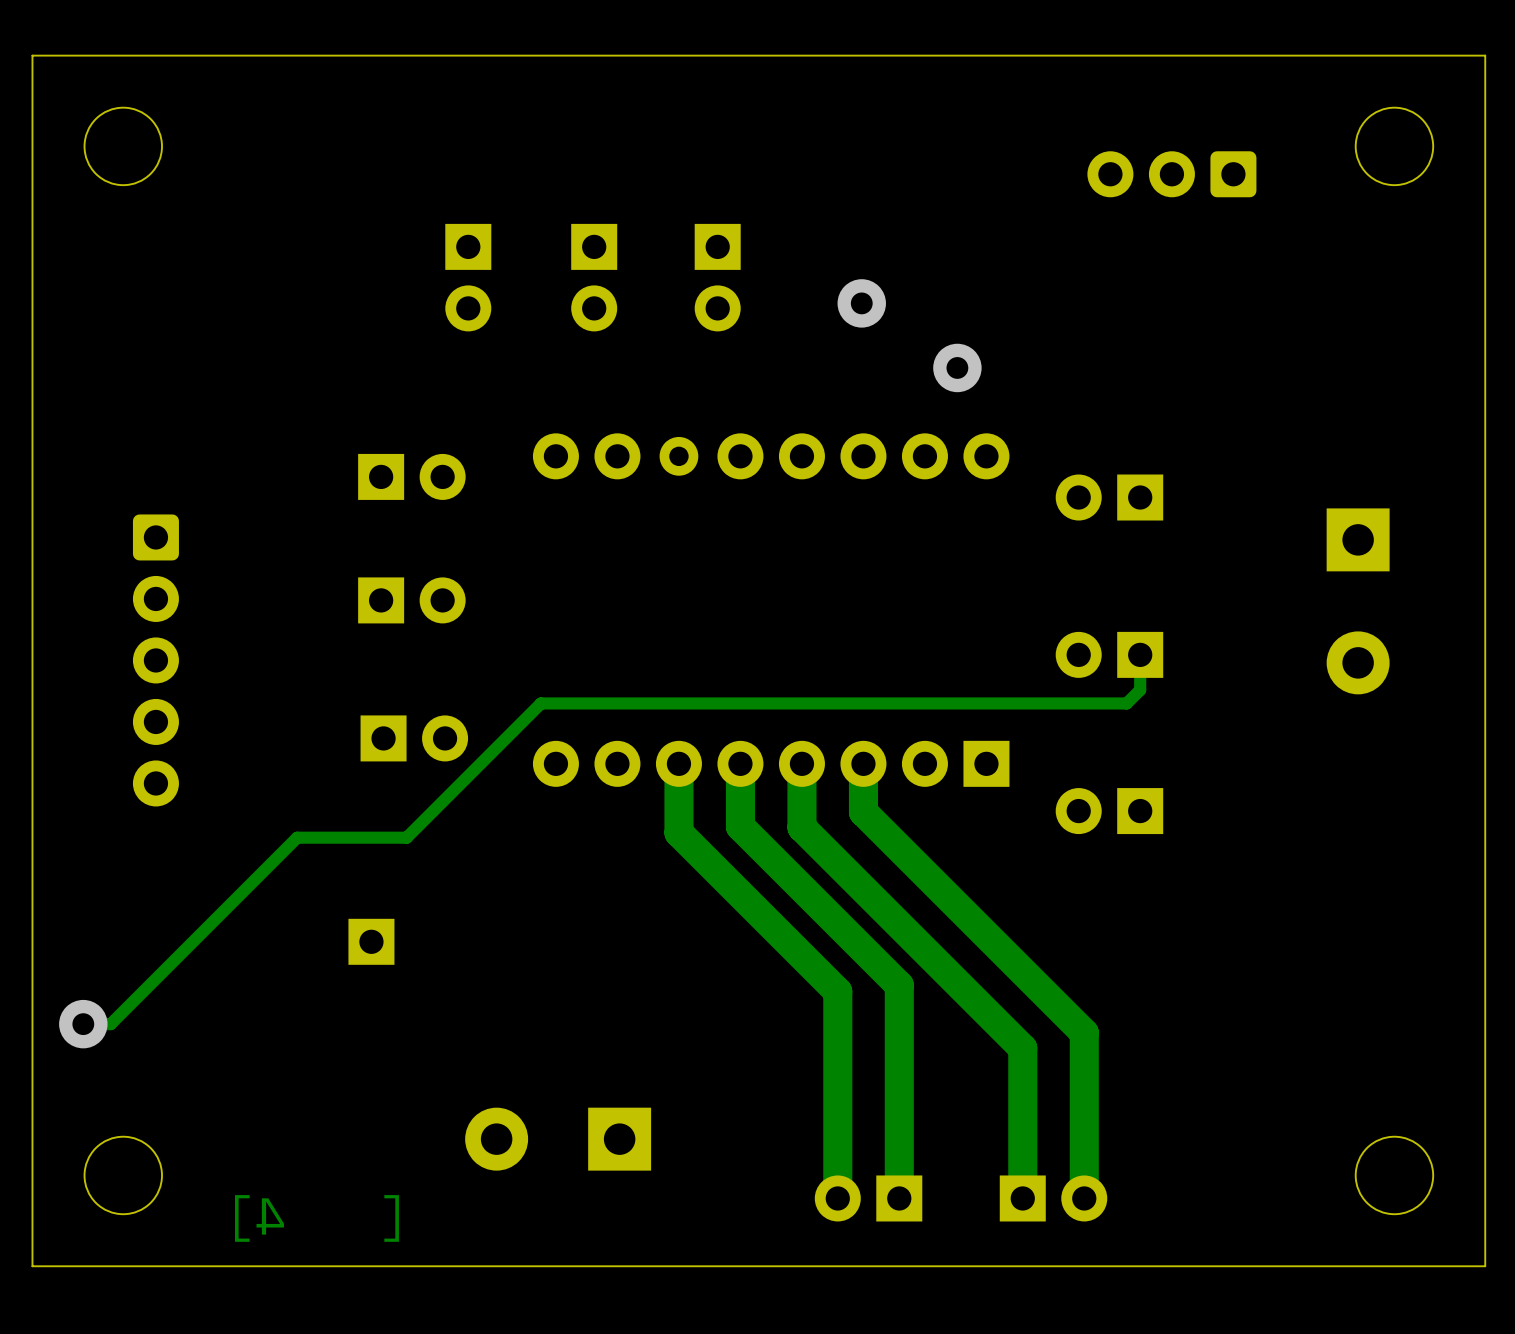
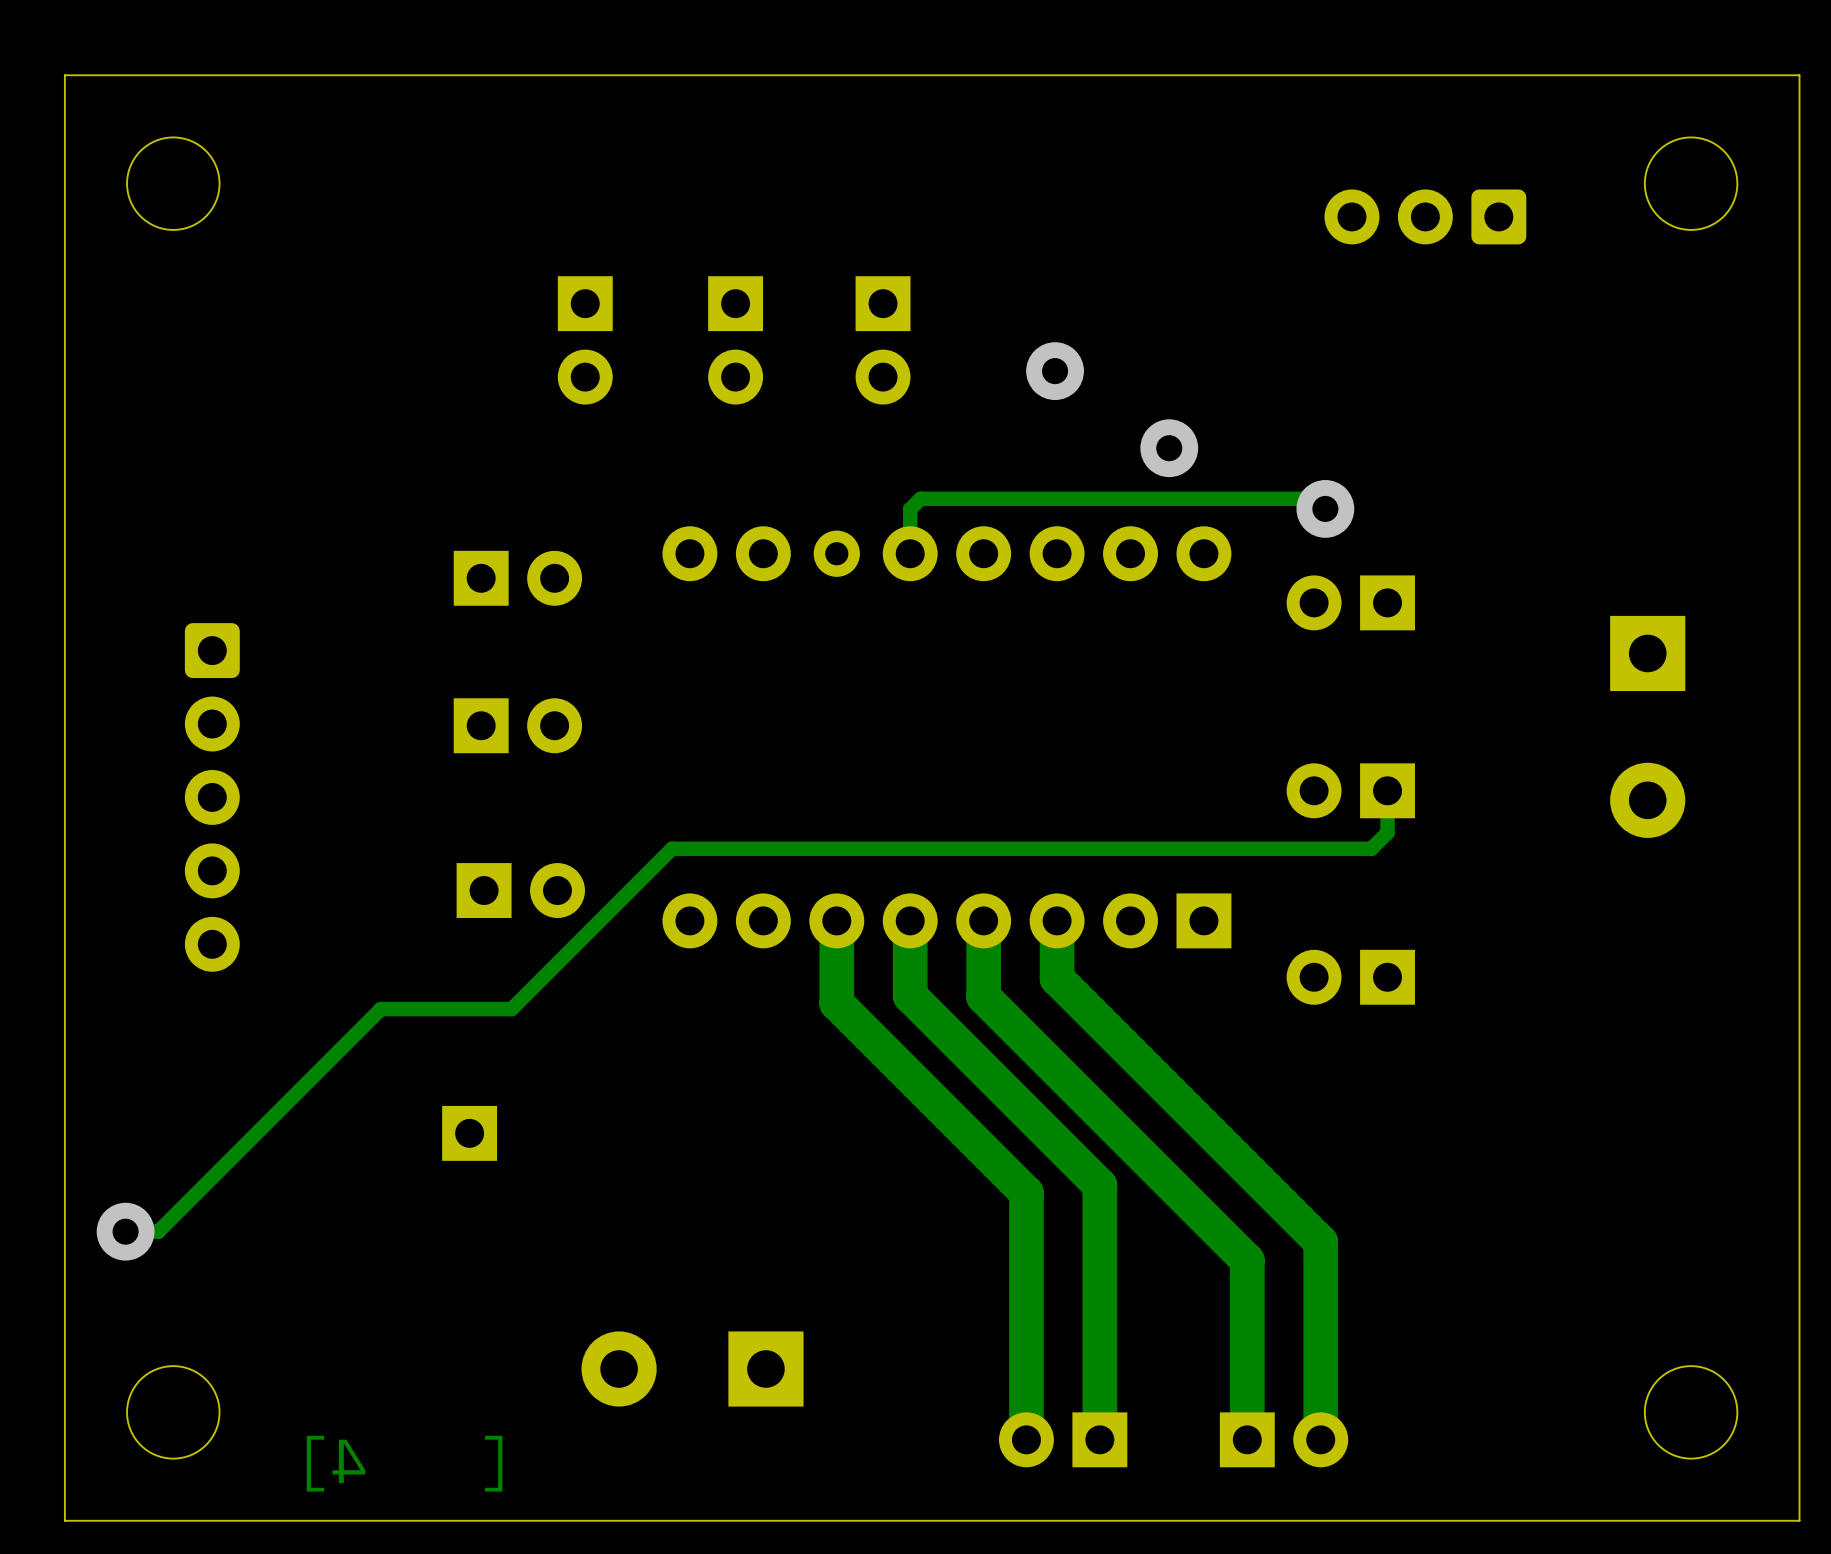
track: none -> (1325, 508) (1315, 498) (920, 498) (910, 509) (910, 553)
via: none -> (1325, 508)

